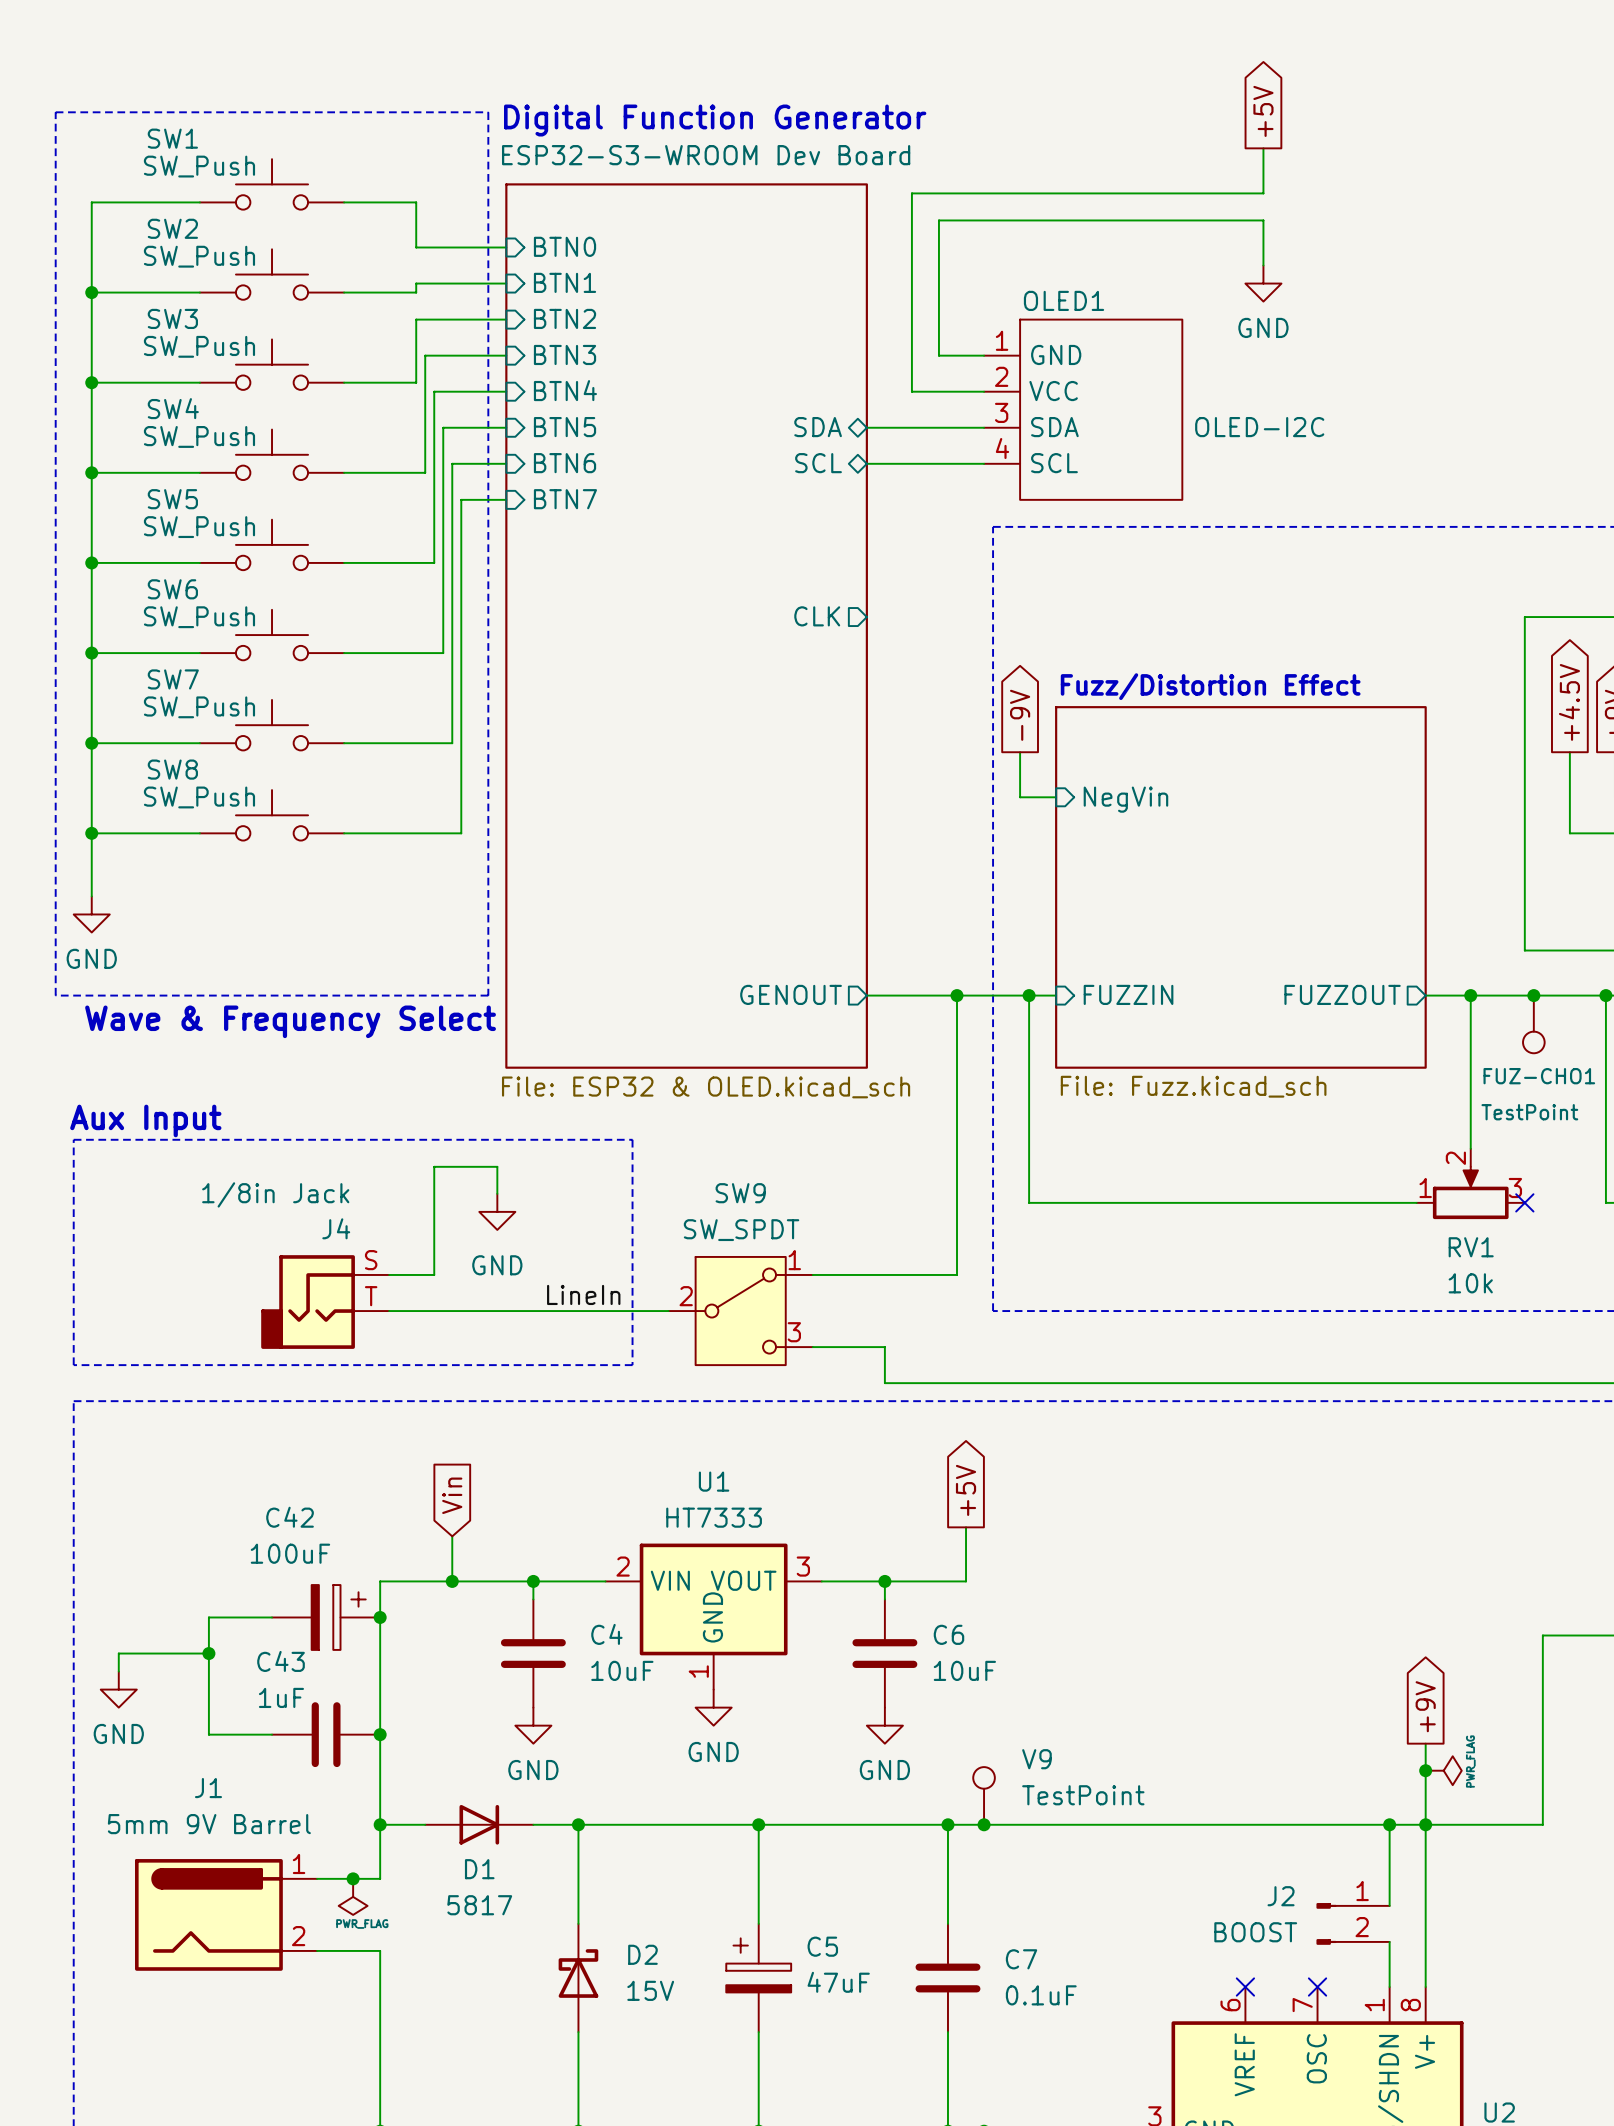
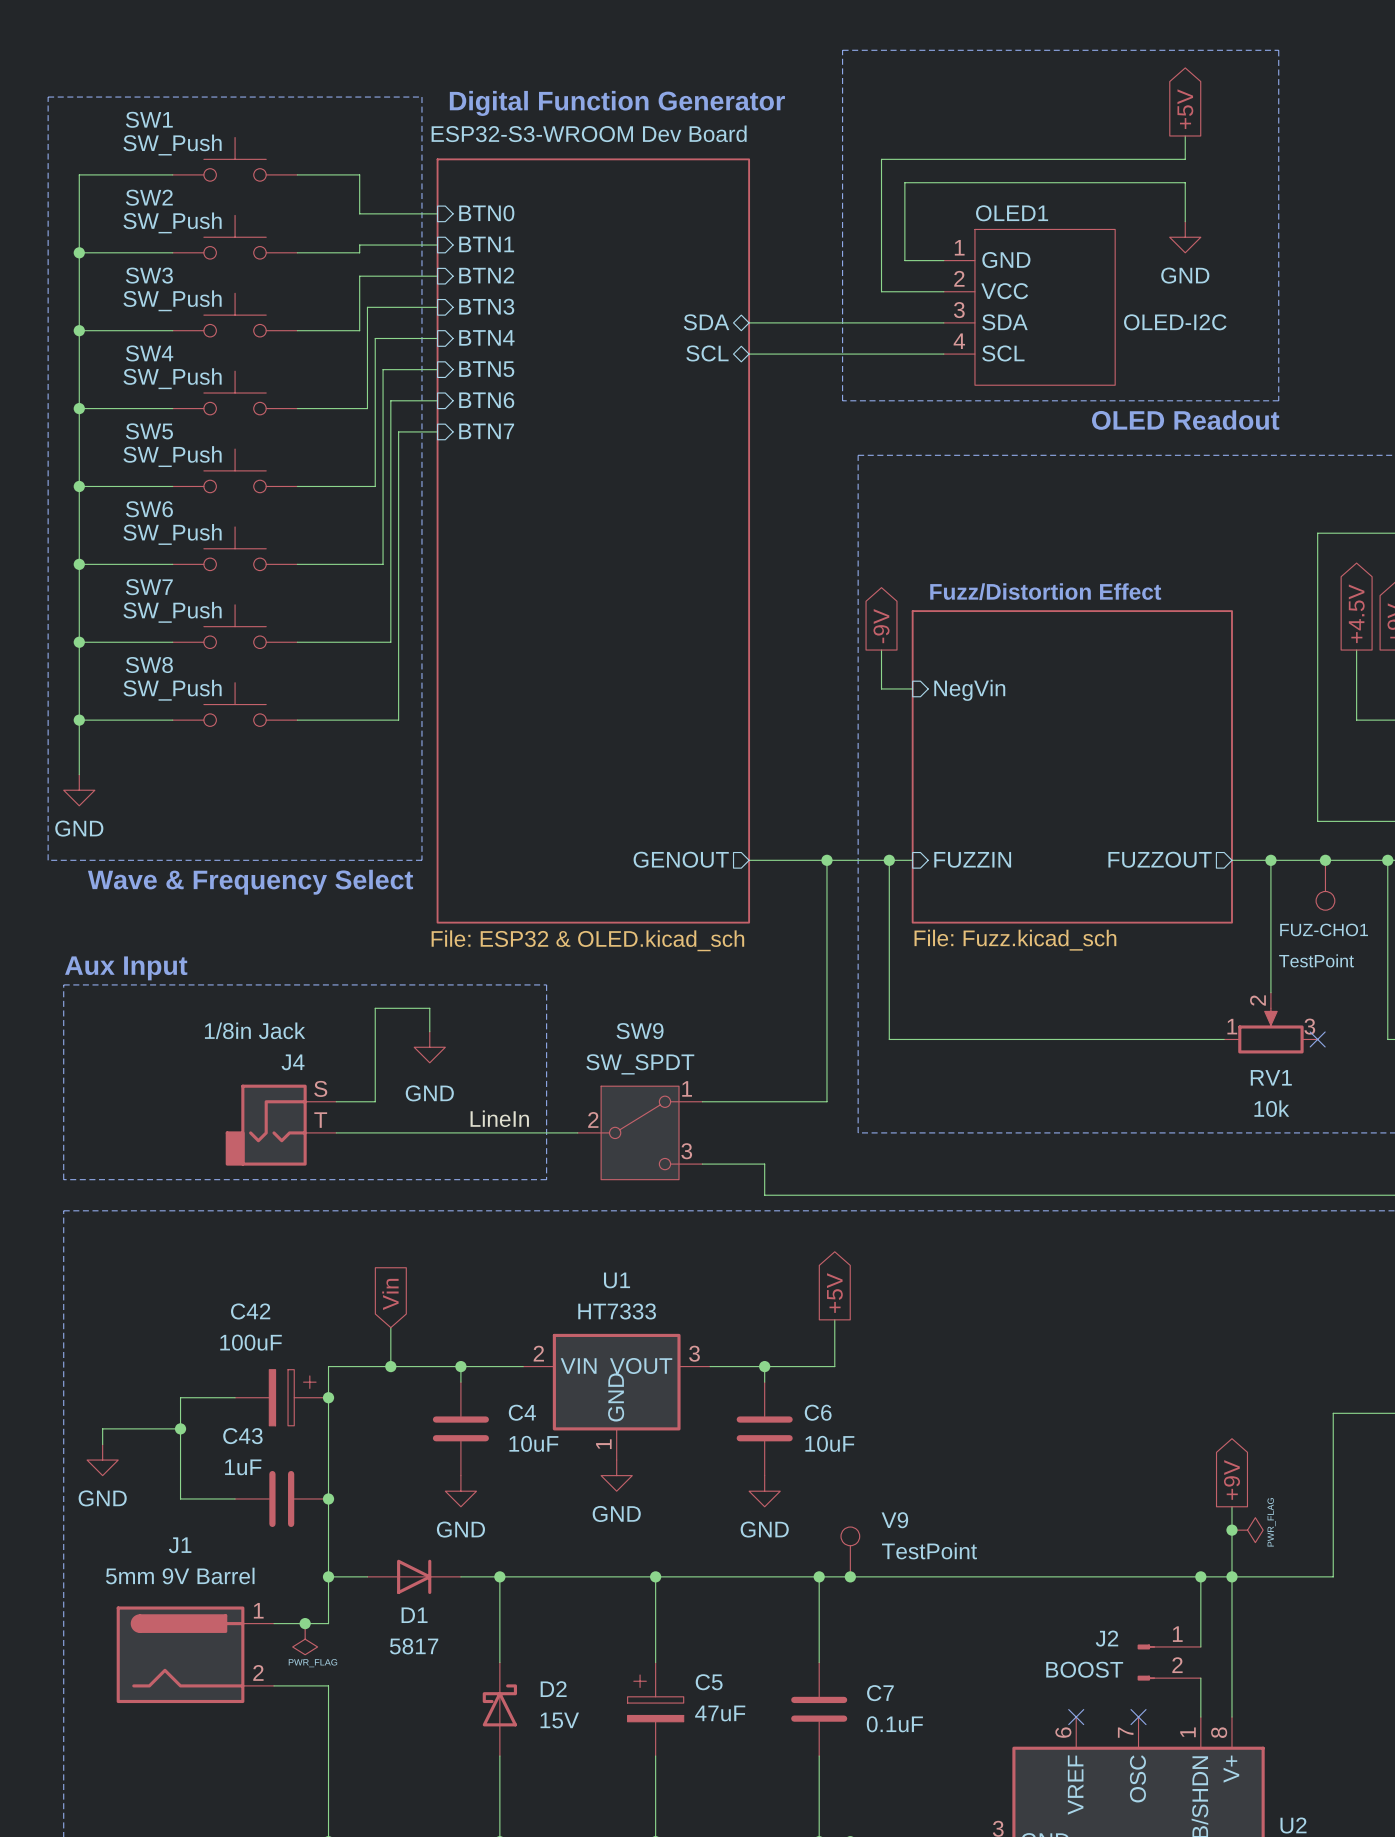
line: none -> (842, 50) (1278, 50) (1278, 400) (842, 400) (842, 50)
global label position: +5V (1263, 111) -> +5V (1185, 109)
wire: (1263, 148) (1263, 193) (911, 193) (911, 391) (984, 391) -> none
wire: none -> (1185, 135) (1185, 159) (881, 159) (881, 291) (943, 291)
wire: none -> (1185, 221) (1185, 182) (904, 182) (904, 260) (943, 260)
wire: (1263, 265) (1263, 220) (938, 220) (938, 355) (984, 355) -> none
power symbol position: GND (1263, 283) -> GND (1185, 237)
wire: none -> (749, 322) (943, 322)
wire: none -> (749, 354) (943, 354)
OLED1 position: (1083, 409) -> (1029, 307)
sheet pin position: SDA (818, 427) -> SDA (706, 322)
wire: (866, 427) (984, 427) -> none
sheet pin position: SCL (818, 463) -> SCL (707, 353)
wire: (866, 463) (984, 463) -> none
text: none -> OLED Readout (1185, 420)
sheet pin: CLK (817, 616) -> none

